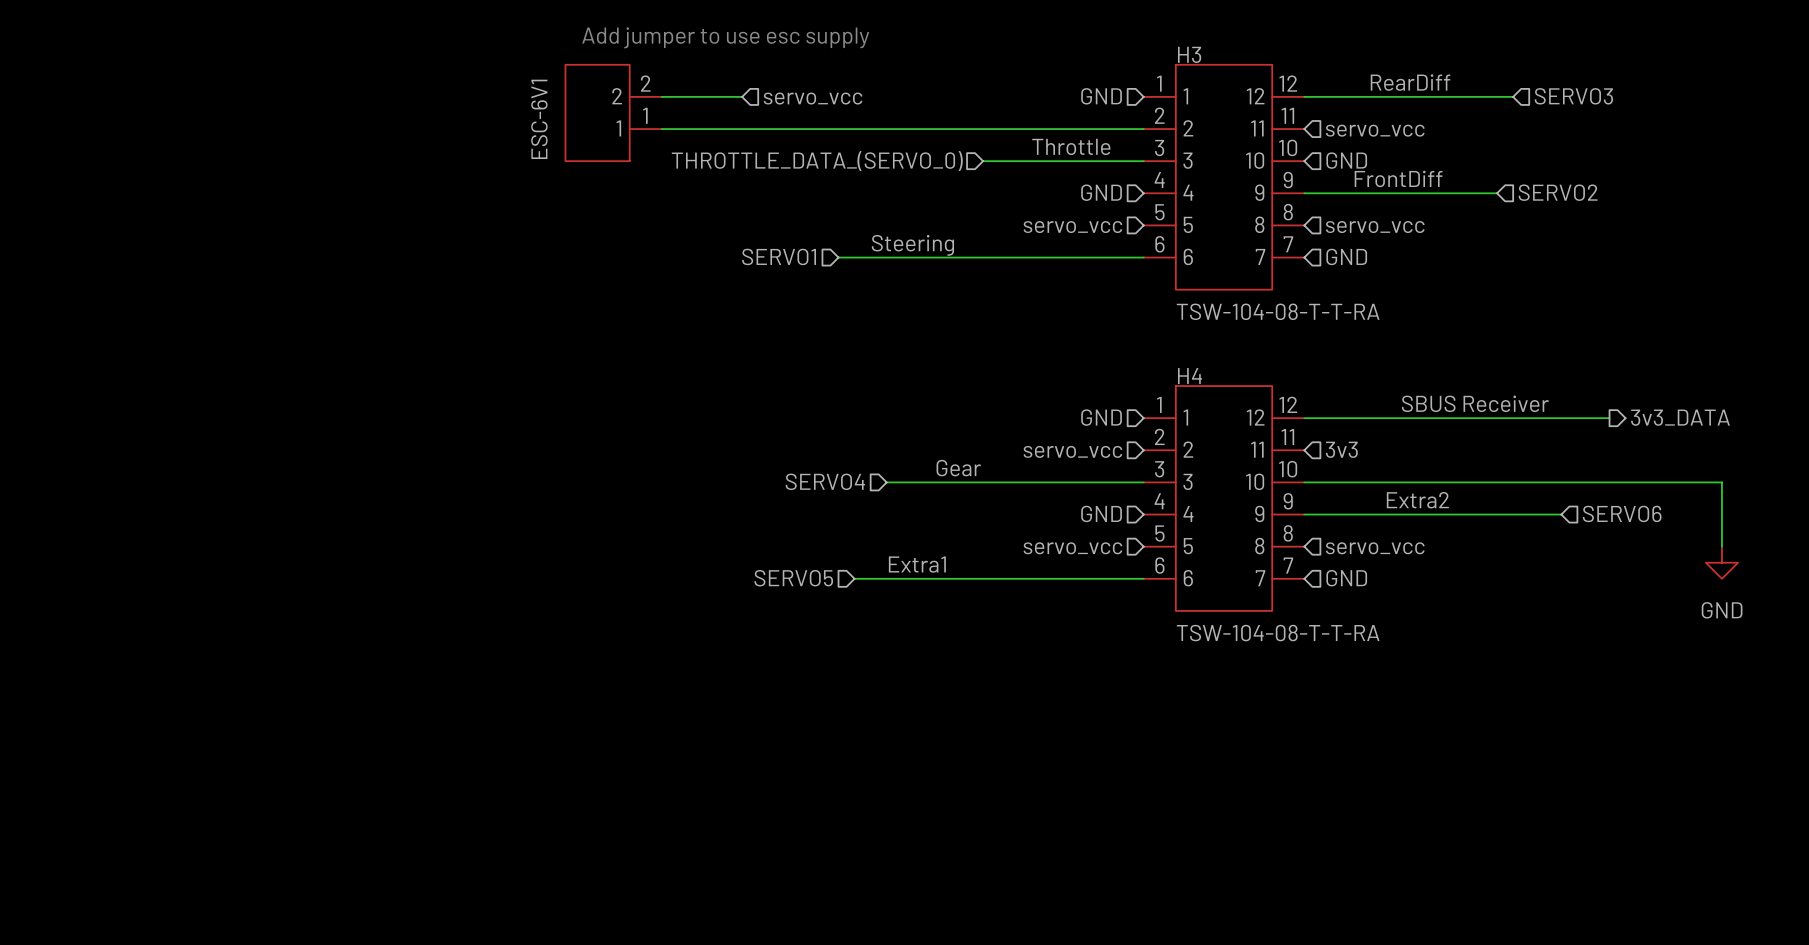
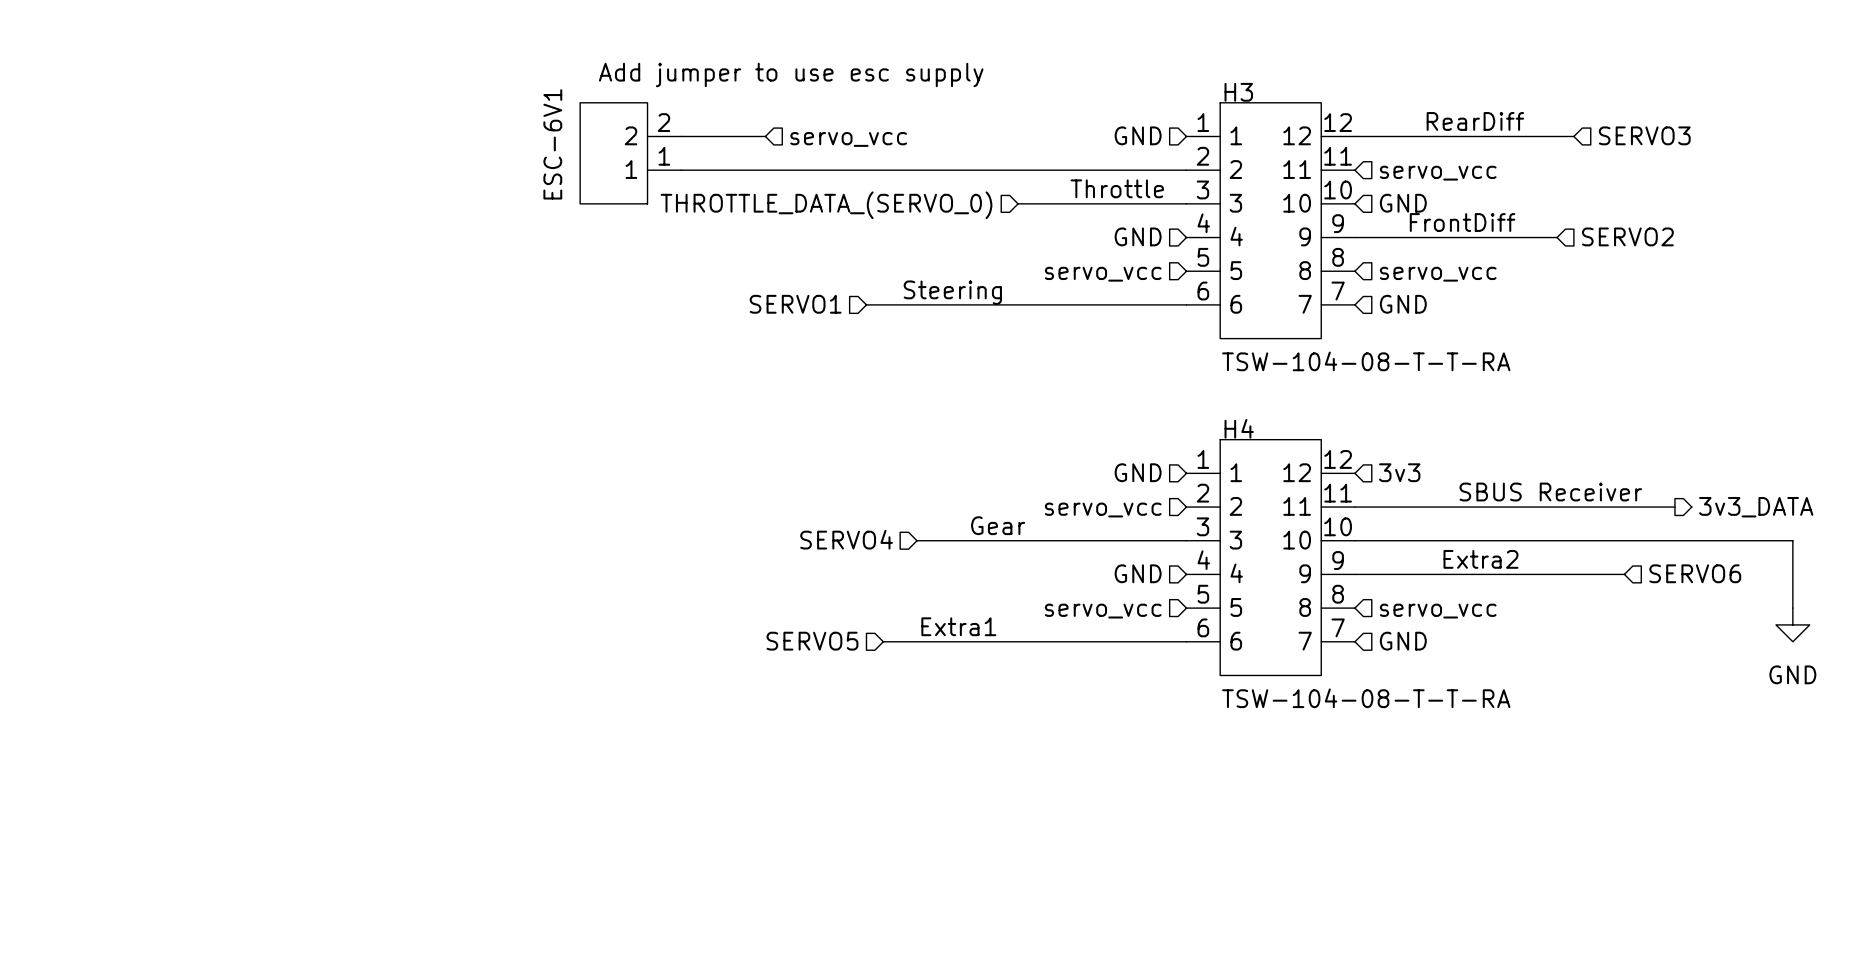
label position: SBUS Receiver (1475, 403) -> SBUS Receiver (1550, 492)
hierarchical label position: 3v3_DATA (1680, 417) -> 3v3_DATA (1756, 507)
wire: (1304, 418) (1609, 418) -> (1354, 507) (1674, 507)
hierarchical label position: 3v3 (1341, 449) -> 3v3 (1399, 472)

